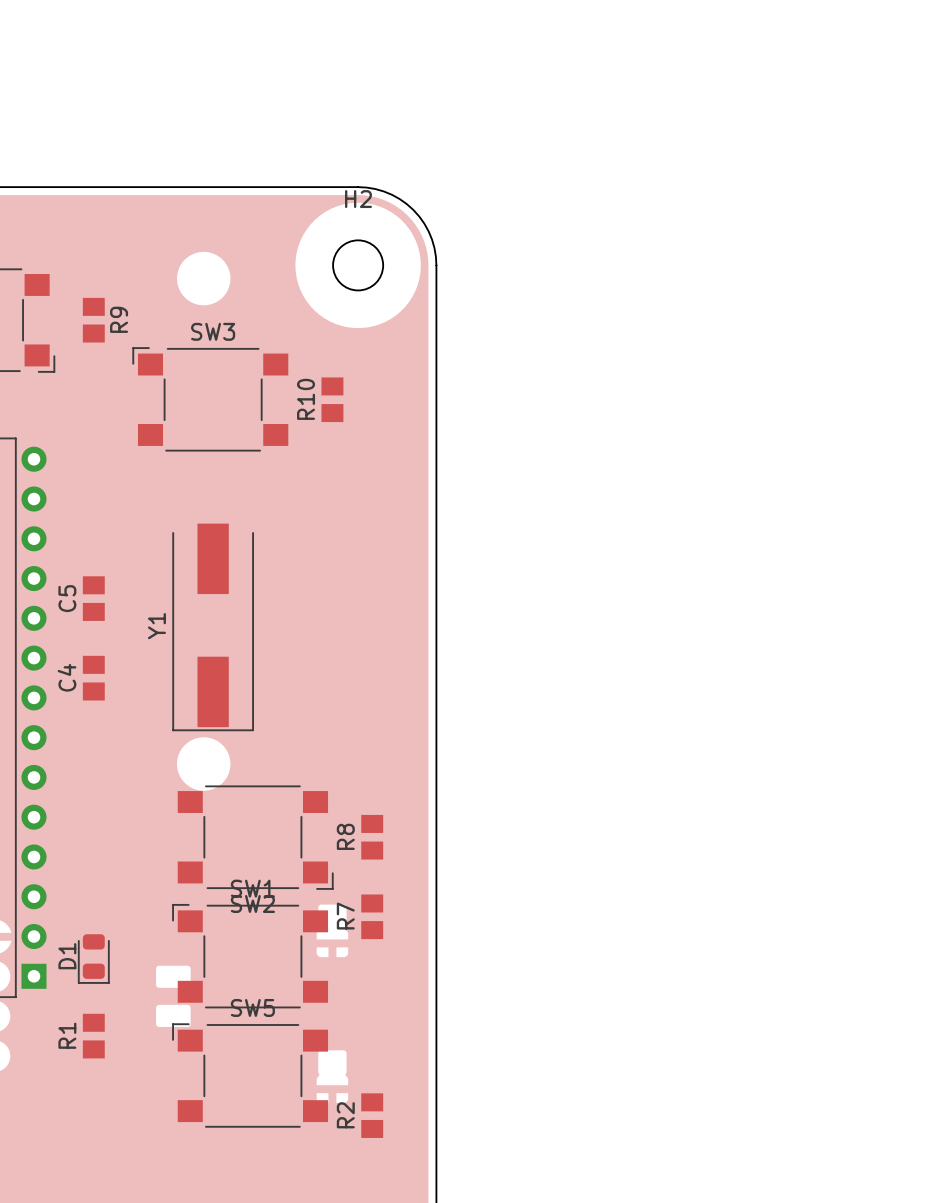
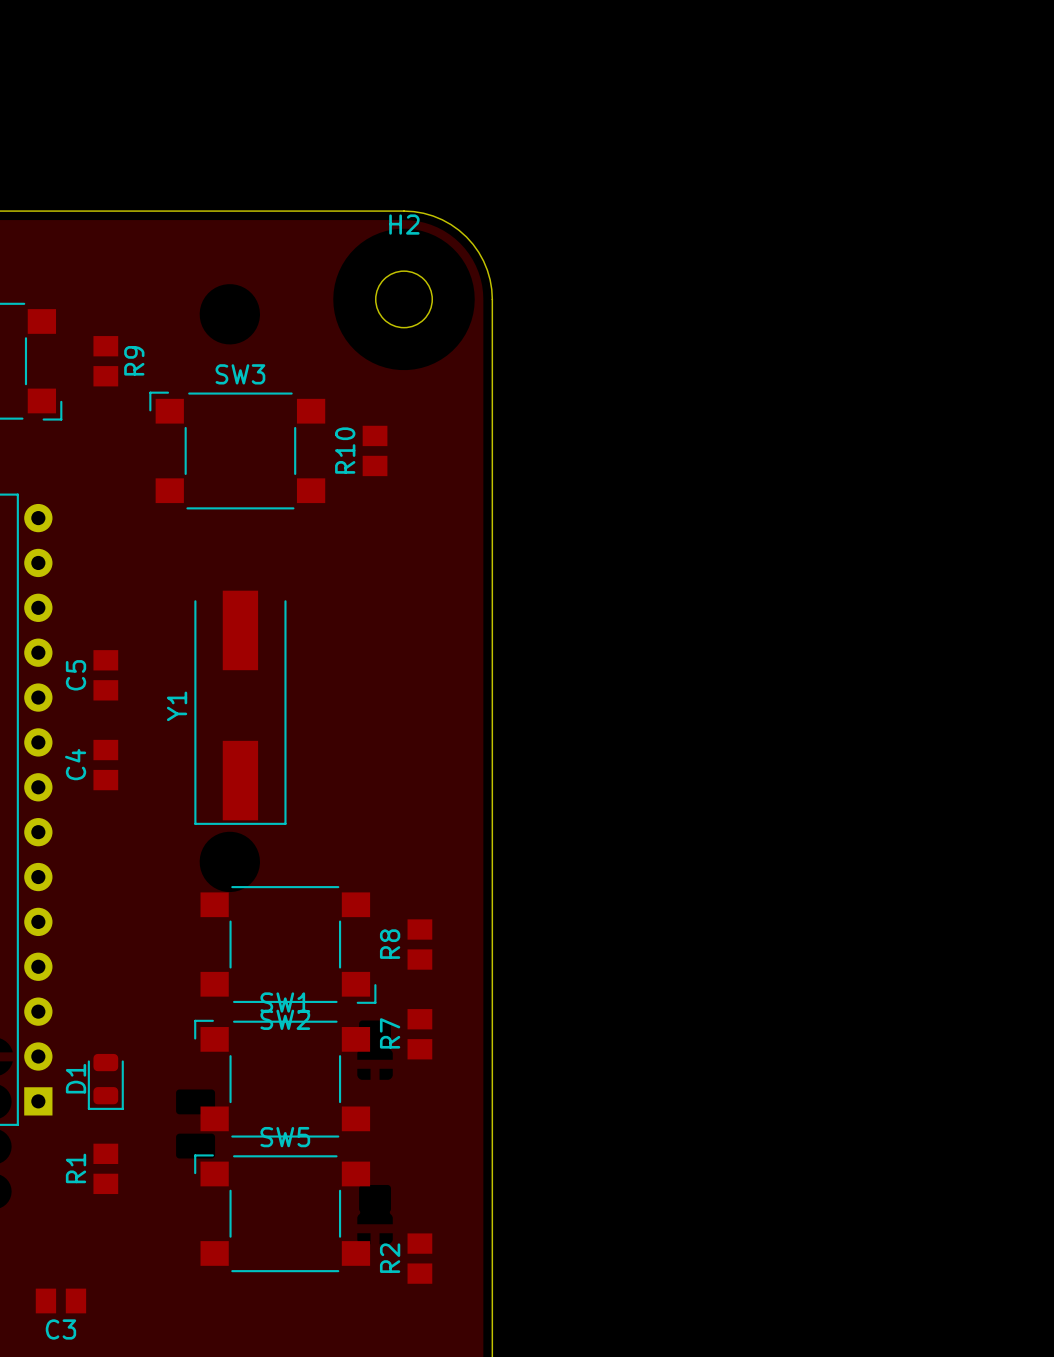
C3: none -> (60, 1300)

